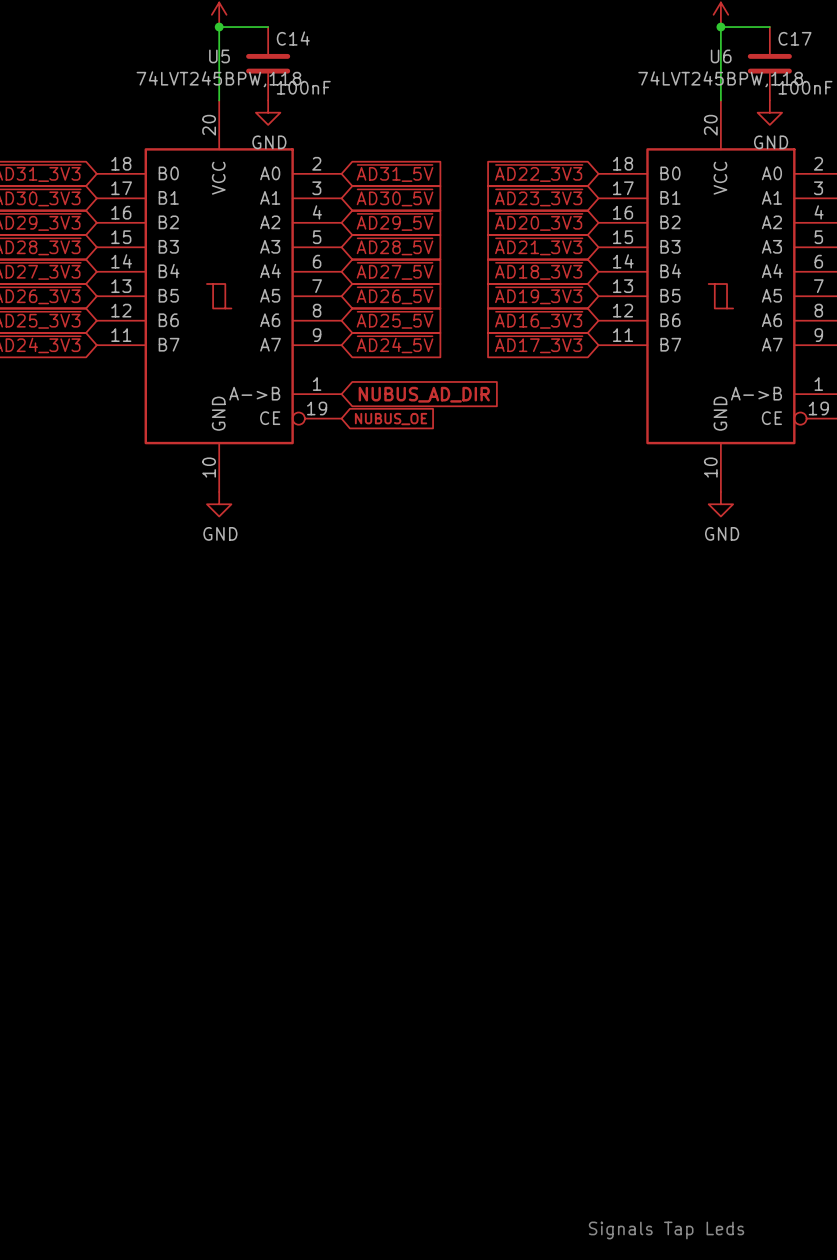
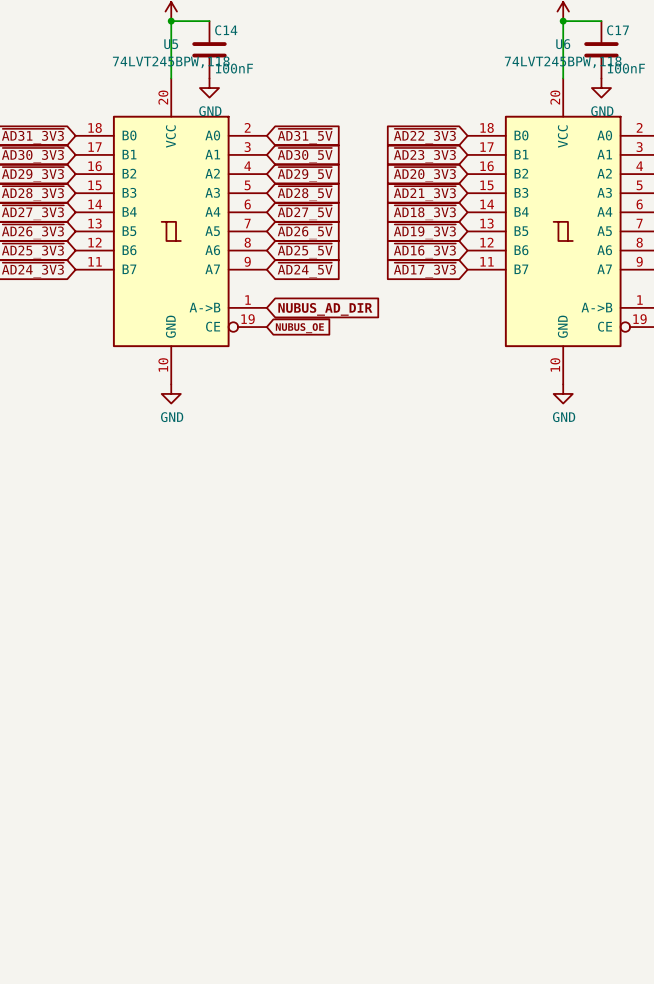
text: Signals Tap Leds (666, 1230) -> none

